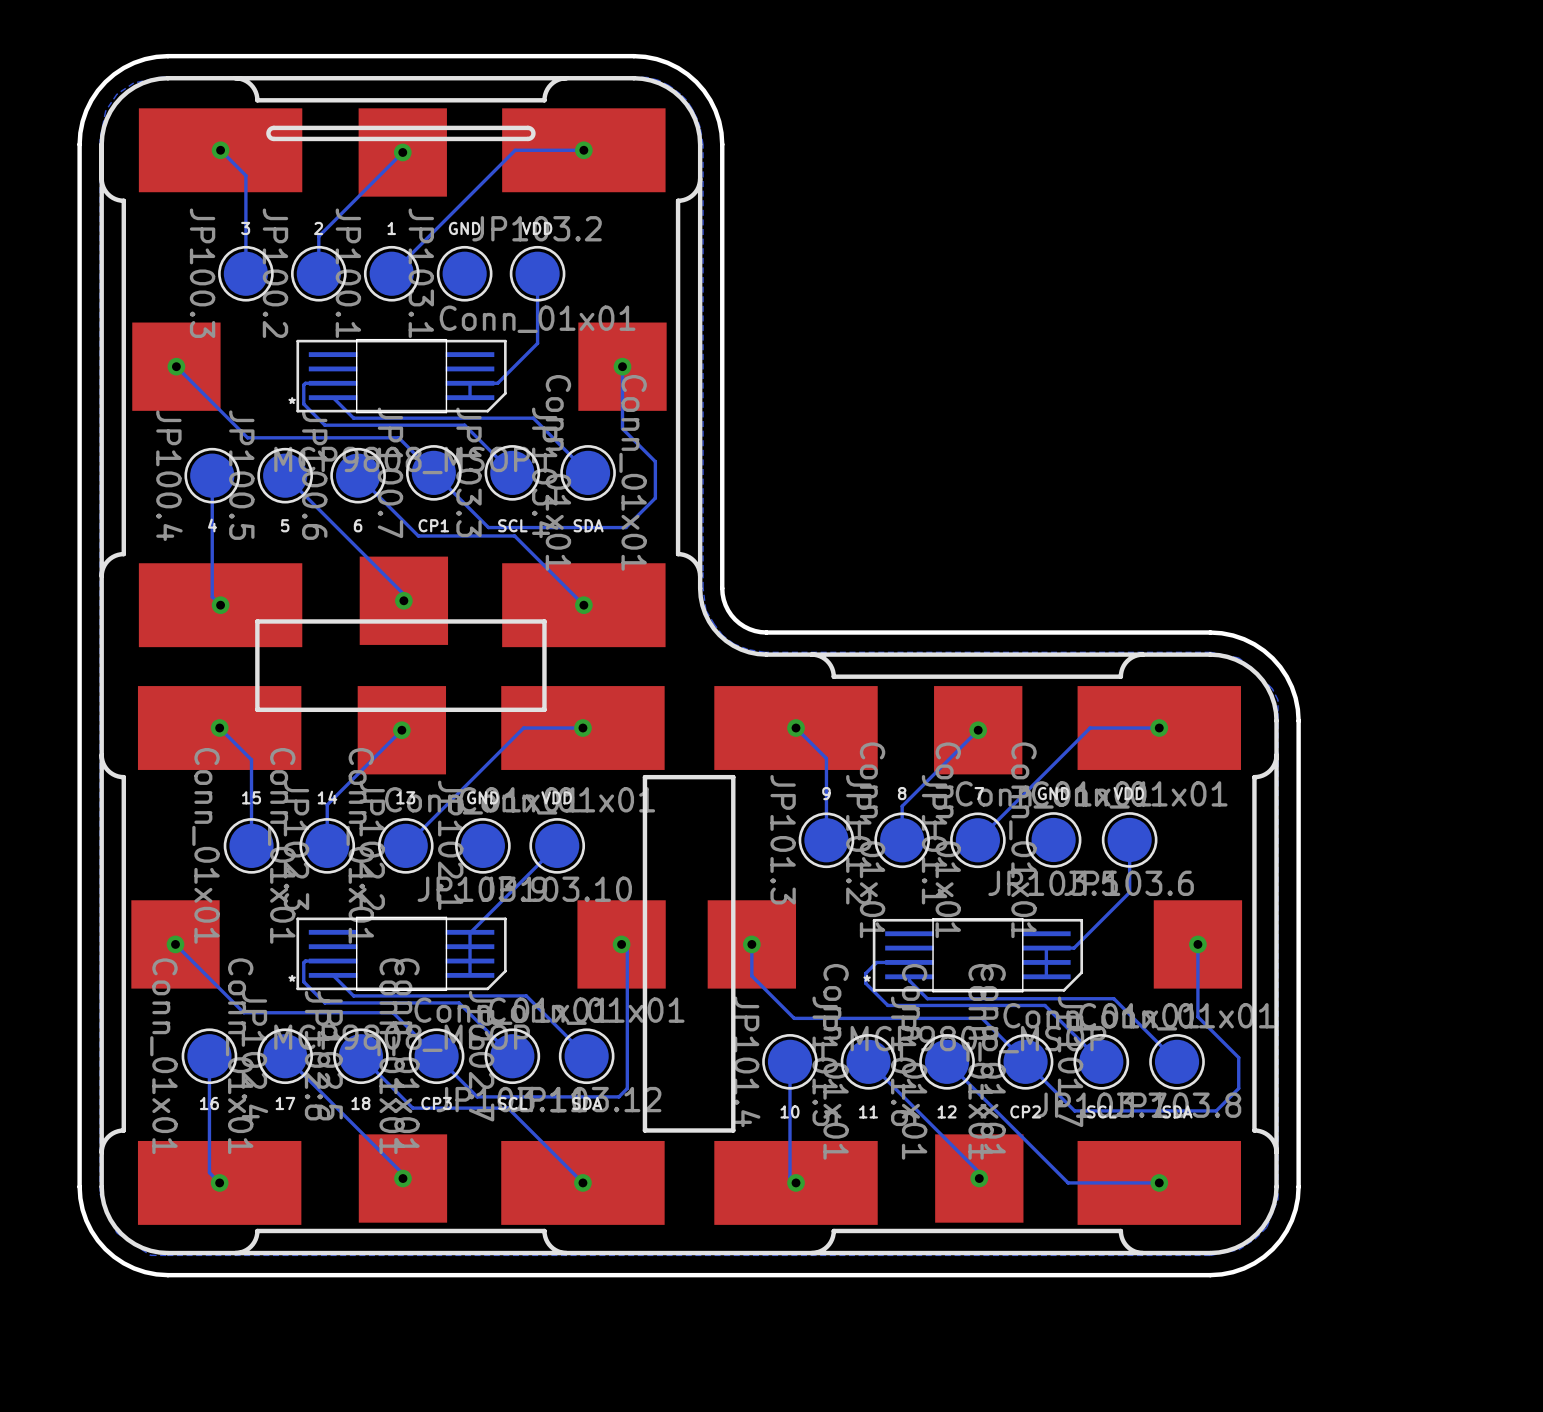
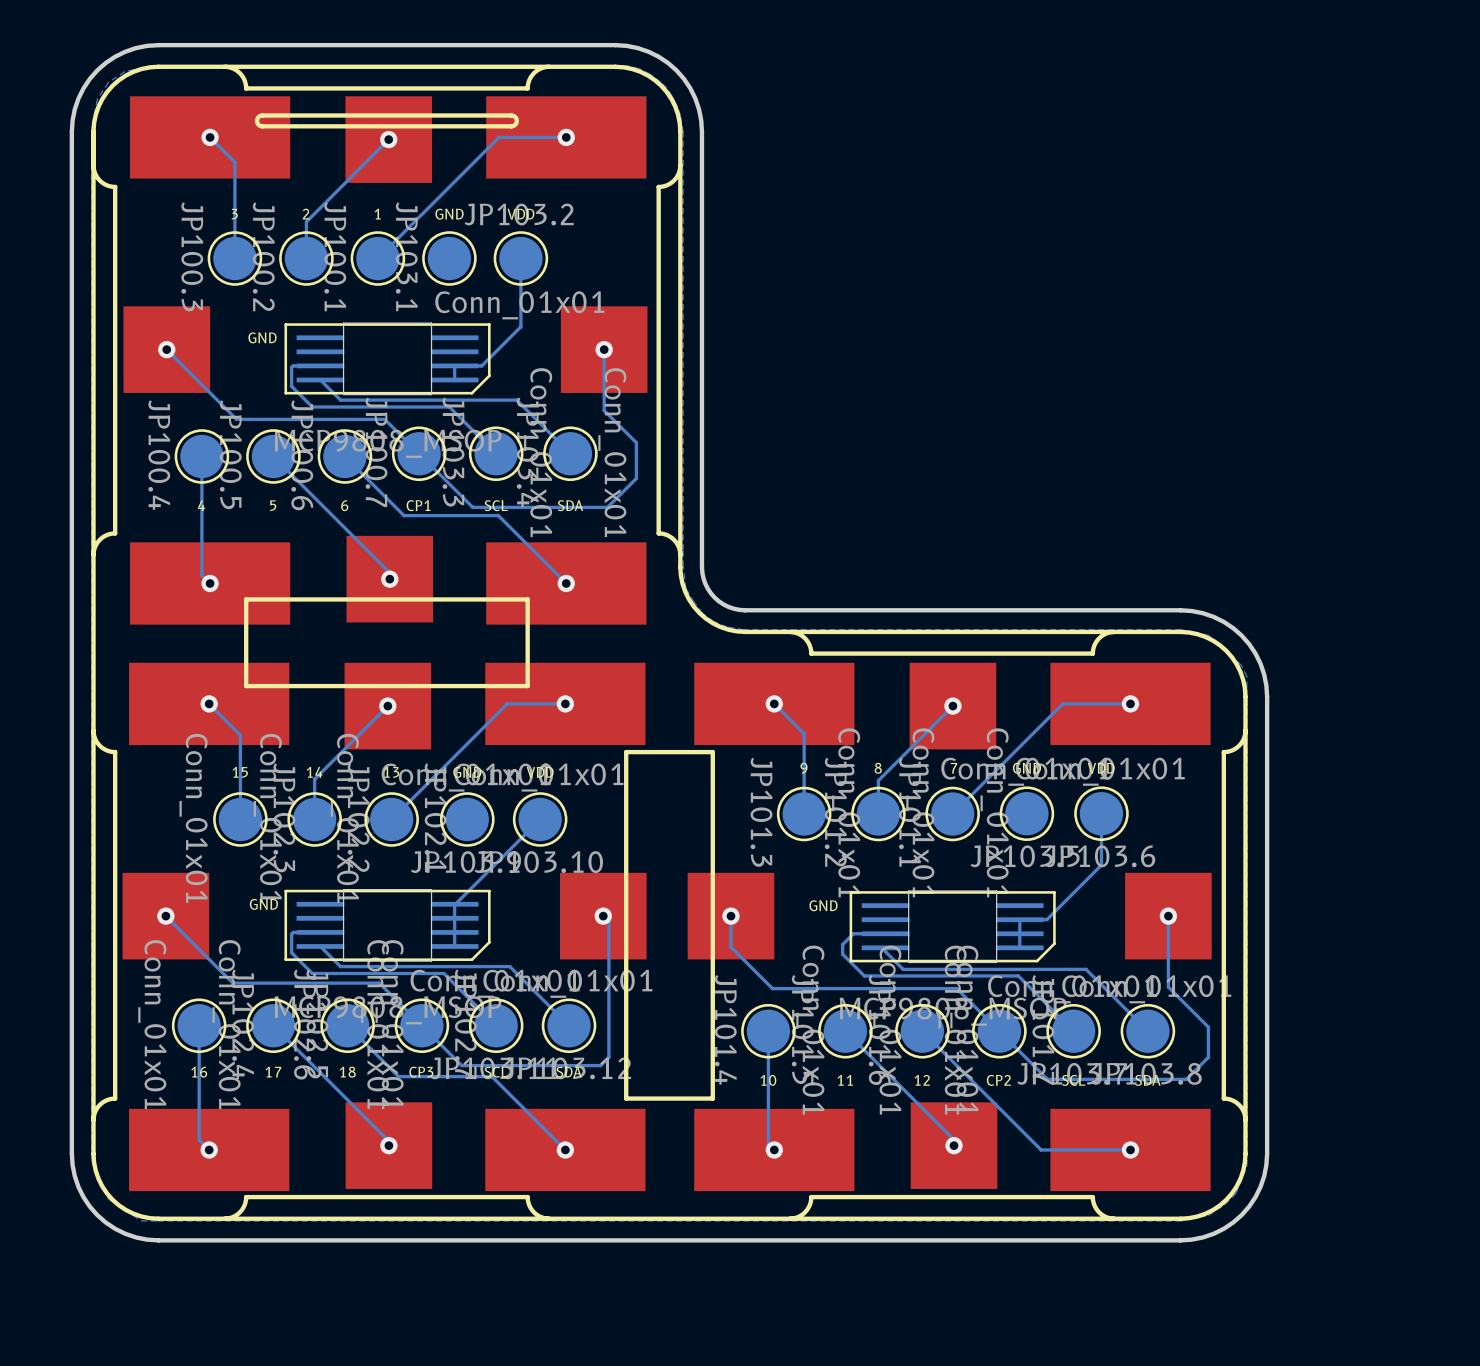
text: none -> GND (262, 337)
text: * (292, 400) -> none
text: none -> GND (263, 904)
text: none -> GND (823, 905)
text: * (292, 978) -> none
text: * (867, 978) -> none

